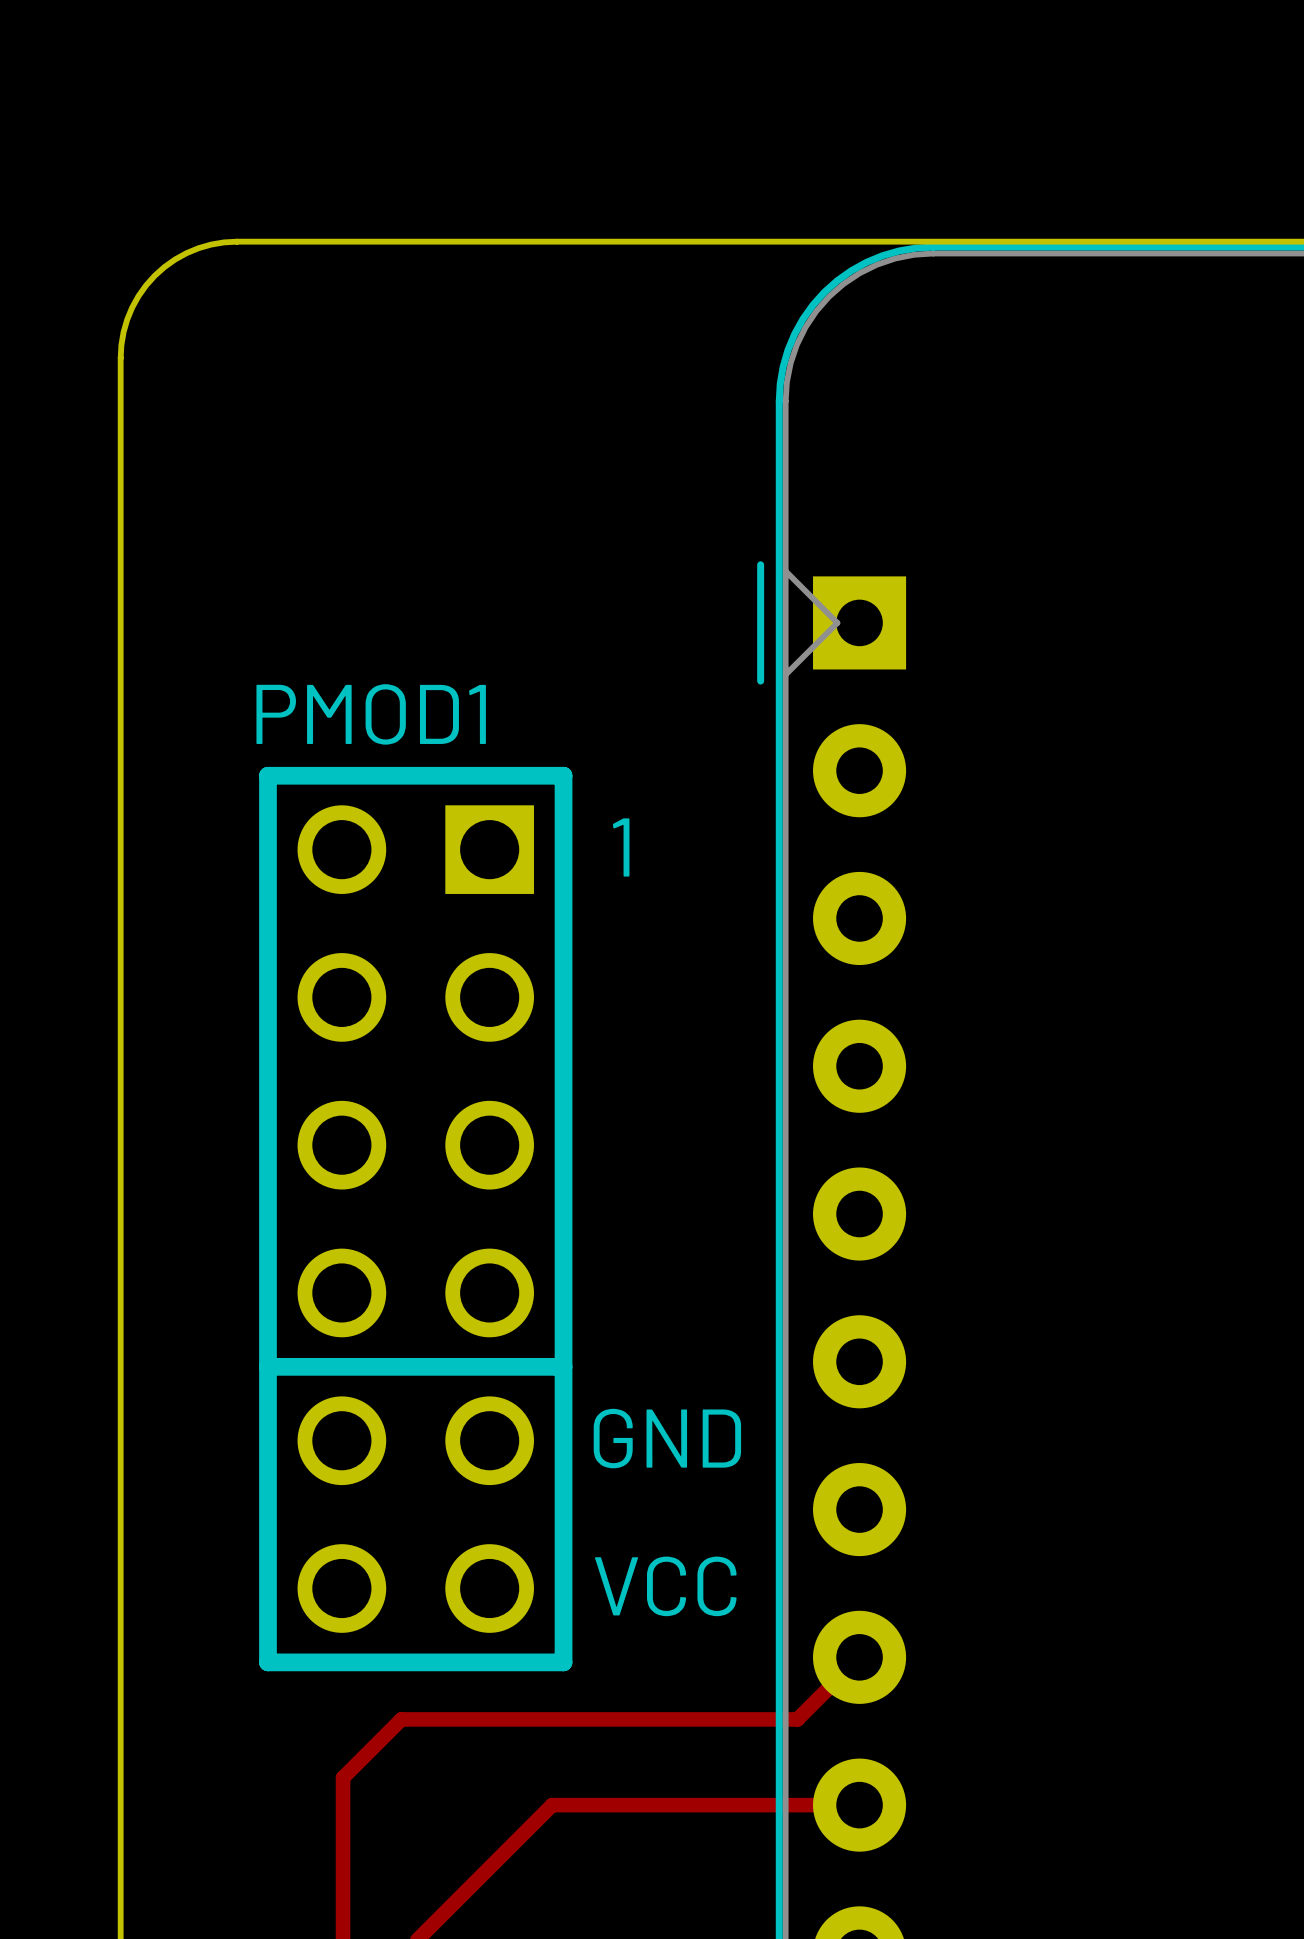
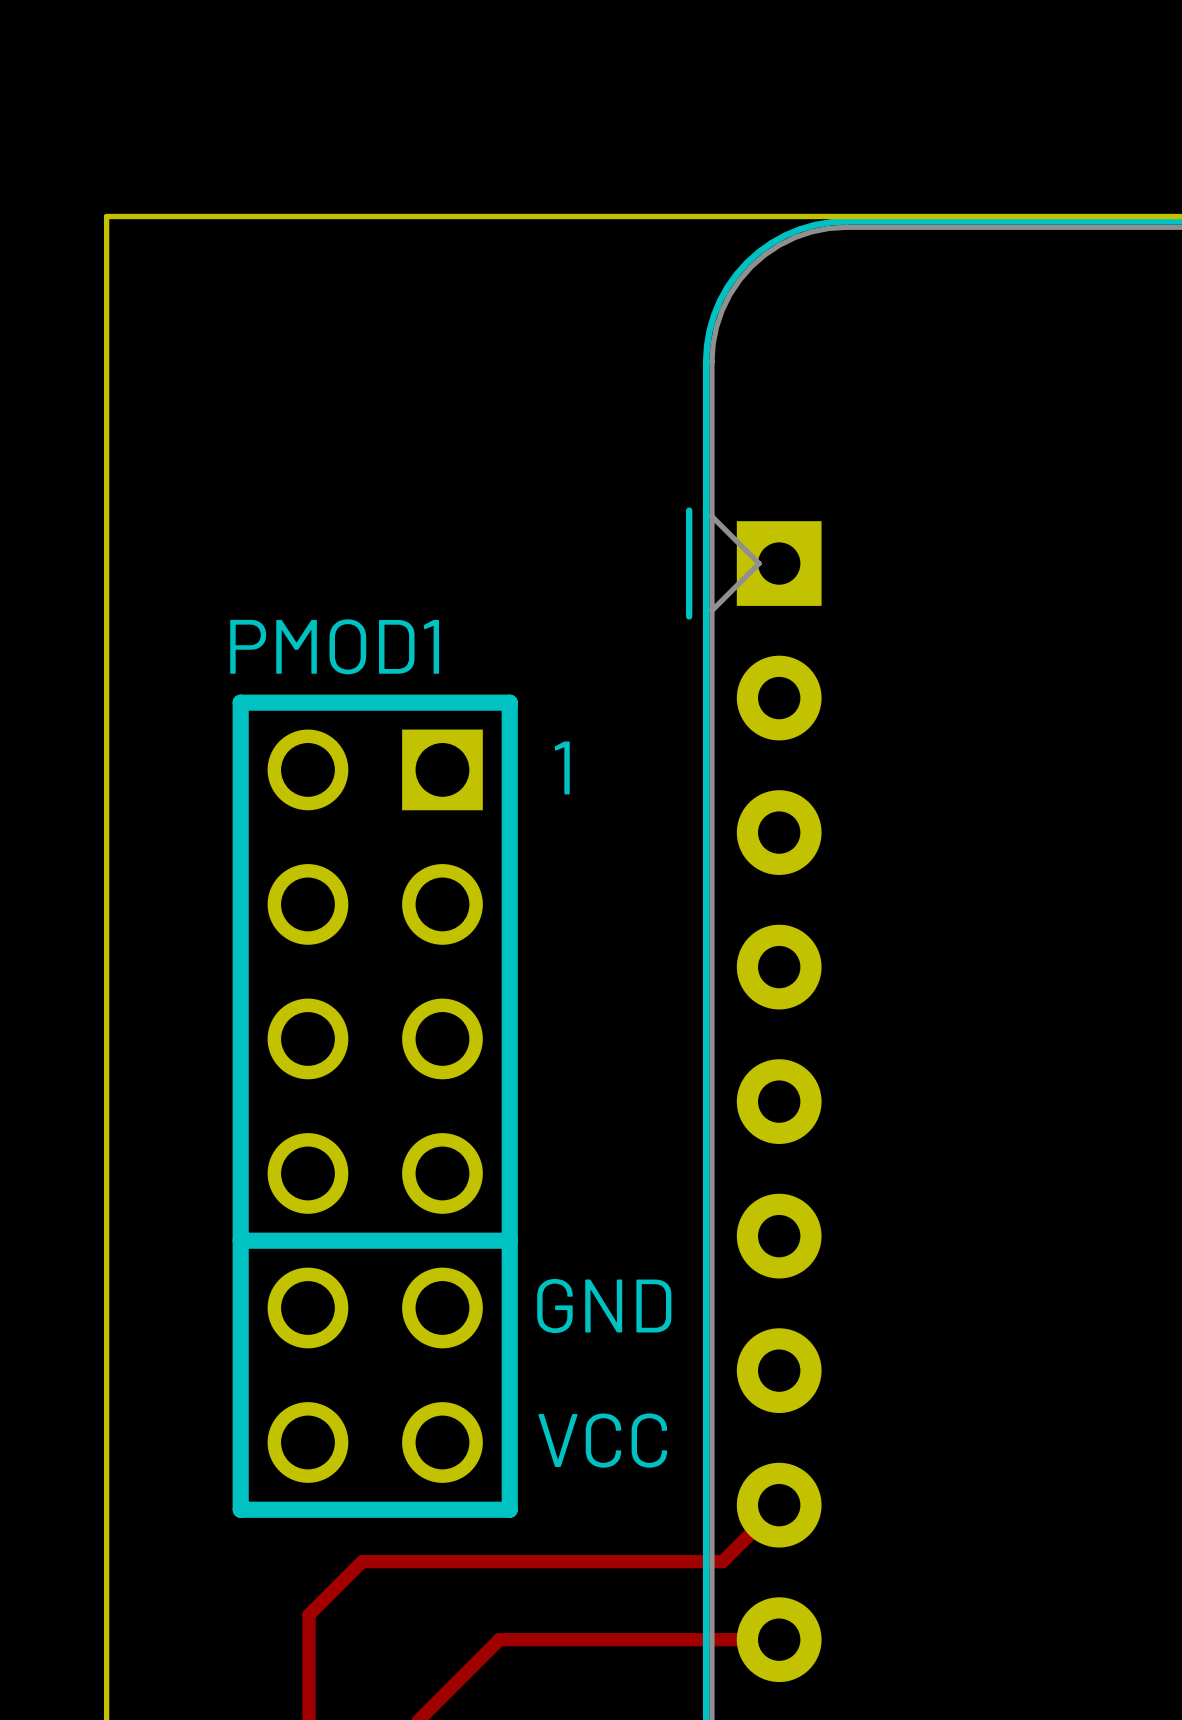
board edge: (237, 241) (198, 248) (175, 259) (154, 275) (132, 307) (123, 332) (120, 358) -> (212, 216) (106, 216) (106, 322)

